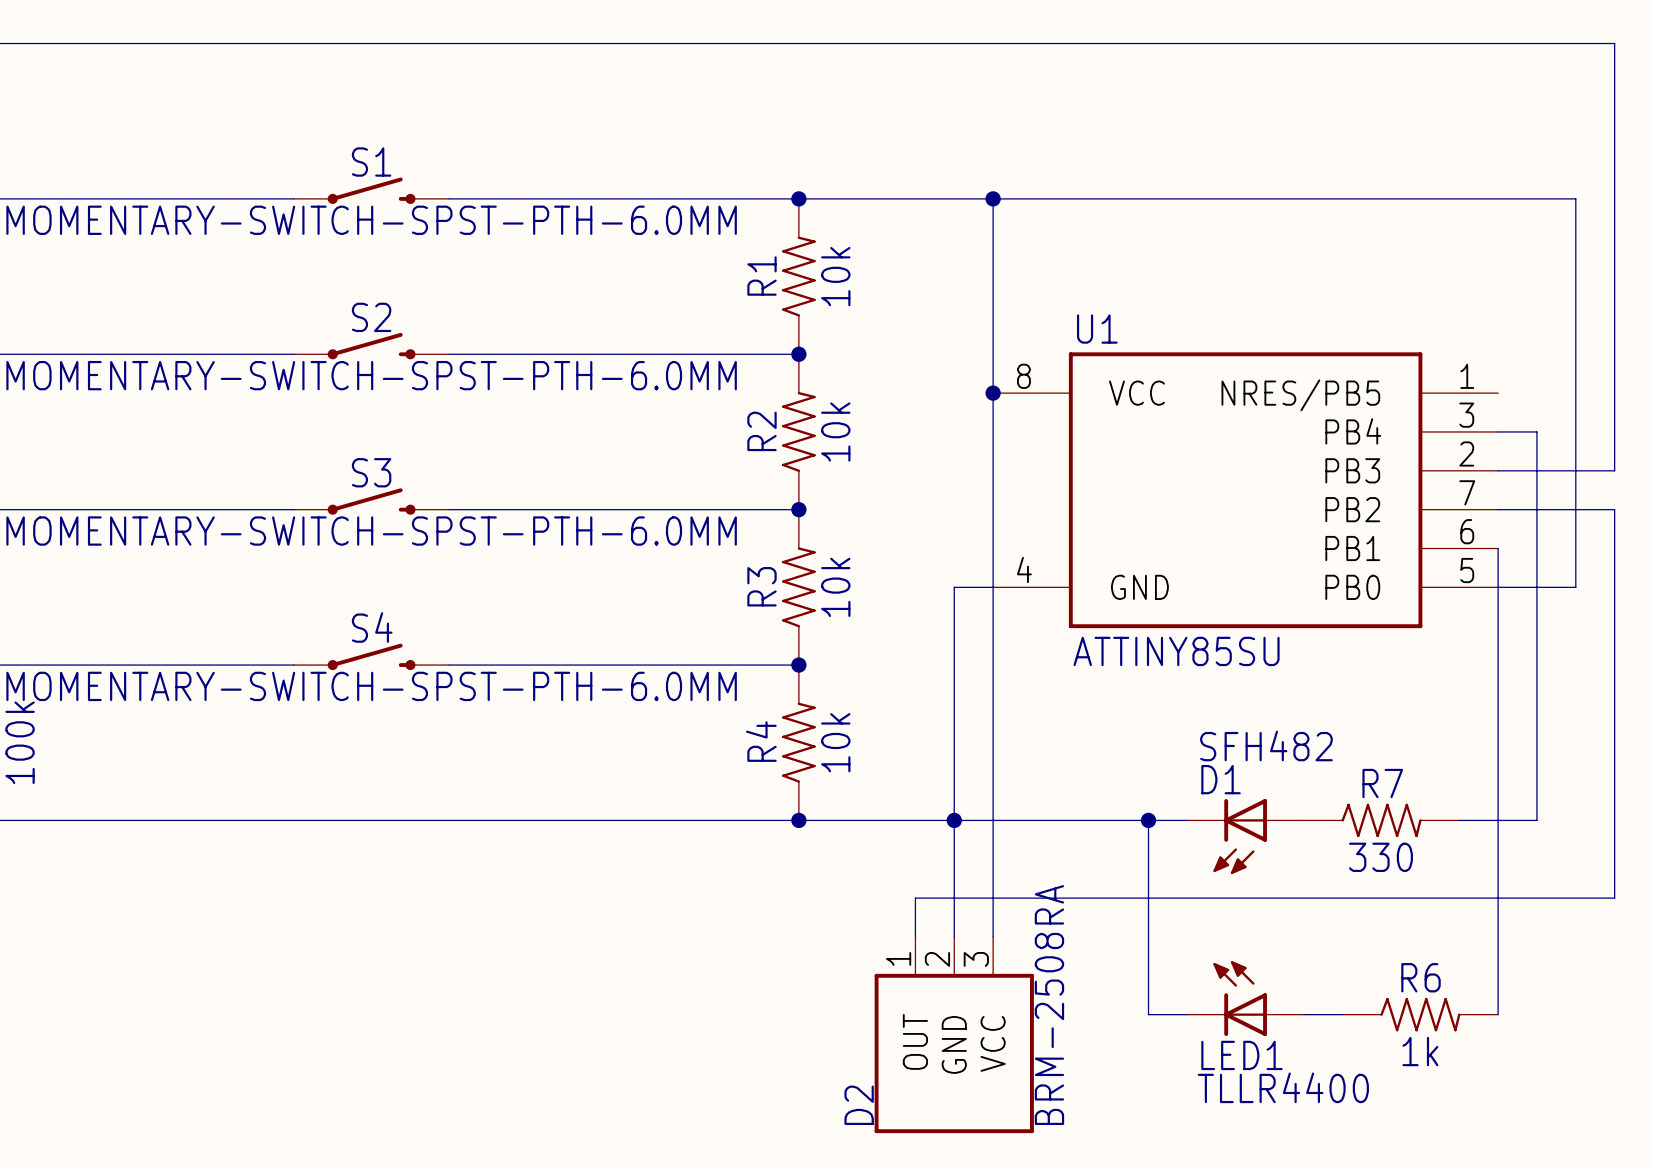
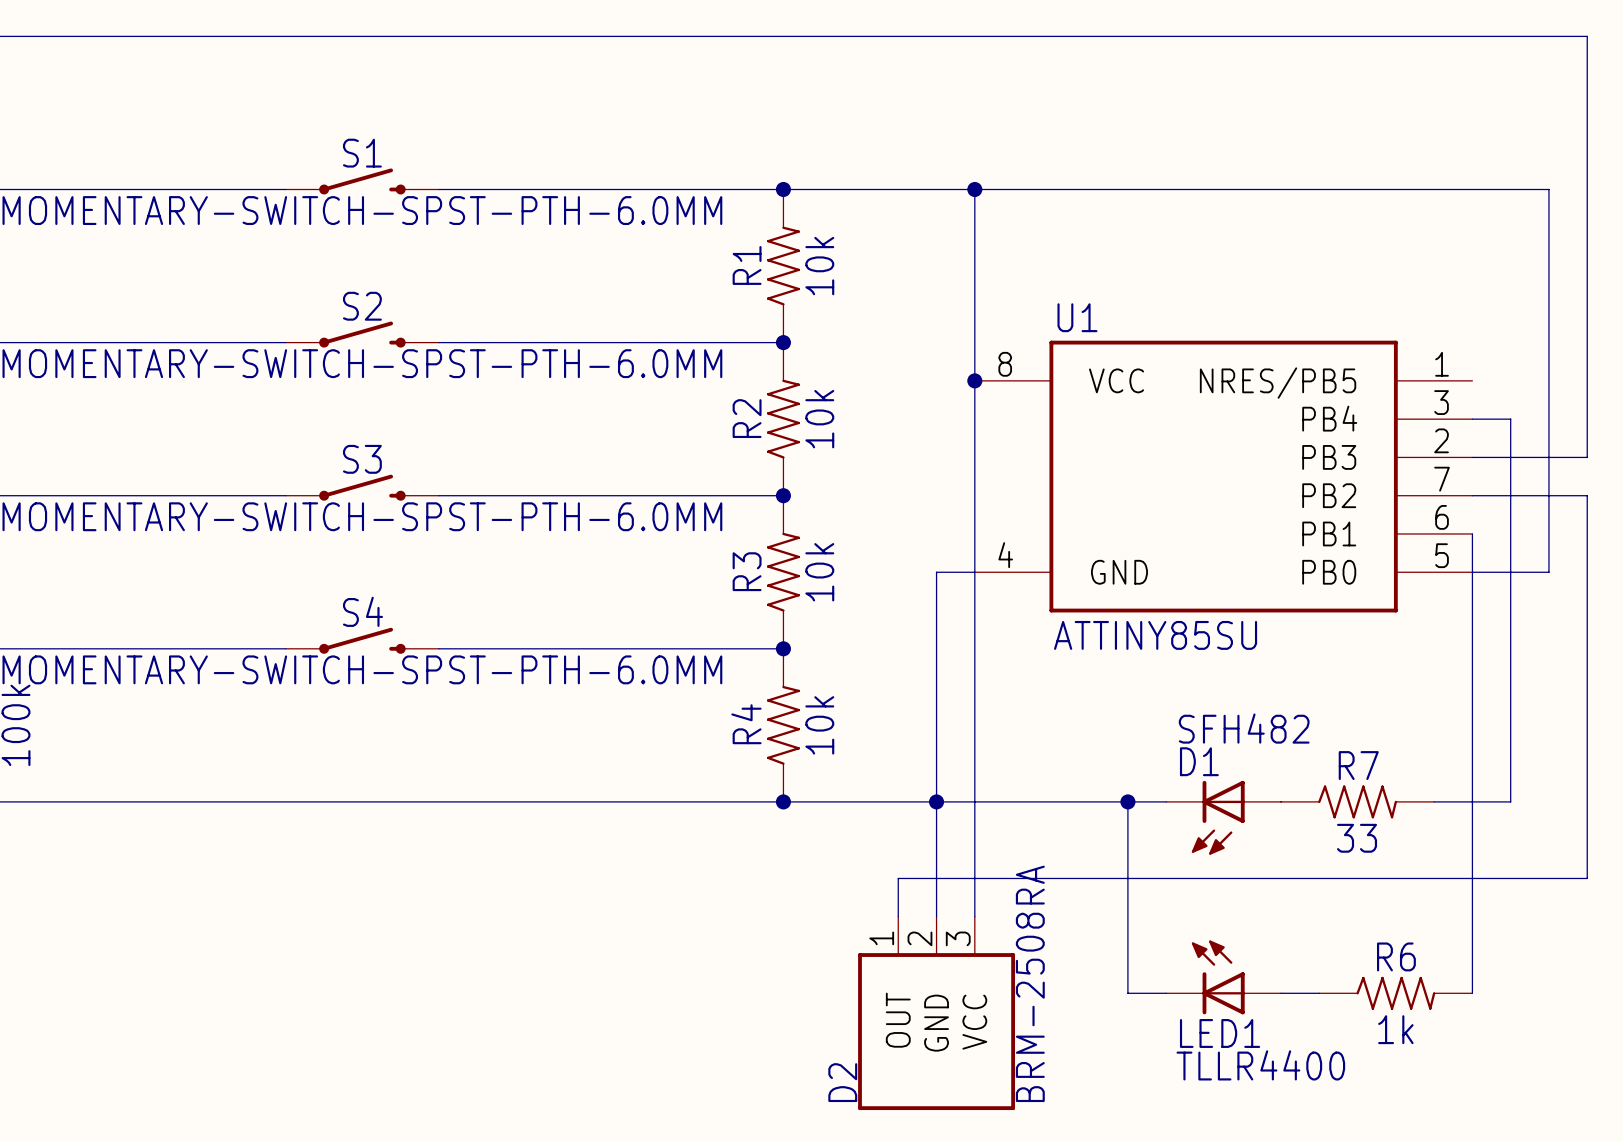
R7 value: 330 (1380, 857) -> 33 (1357, 838)

